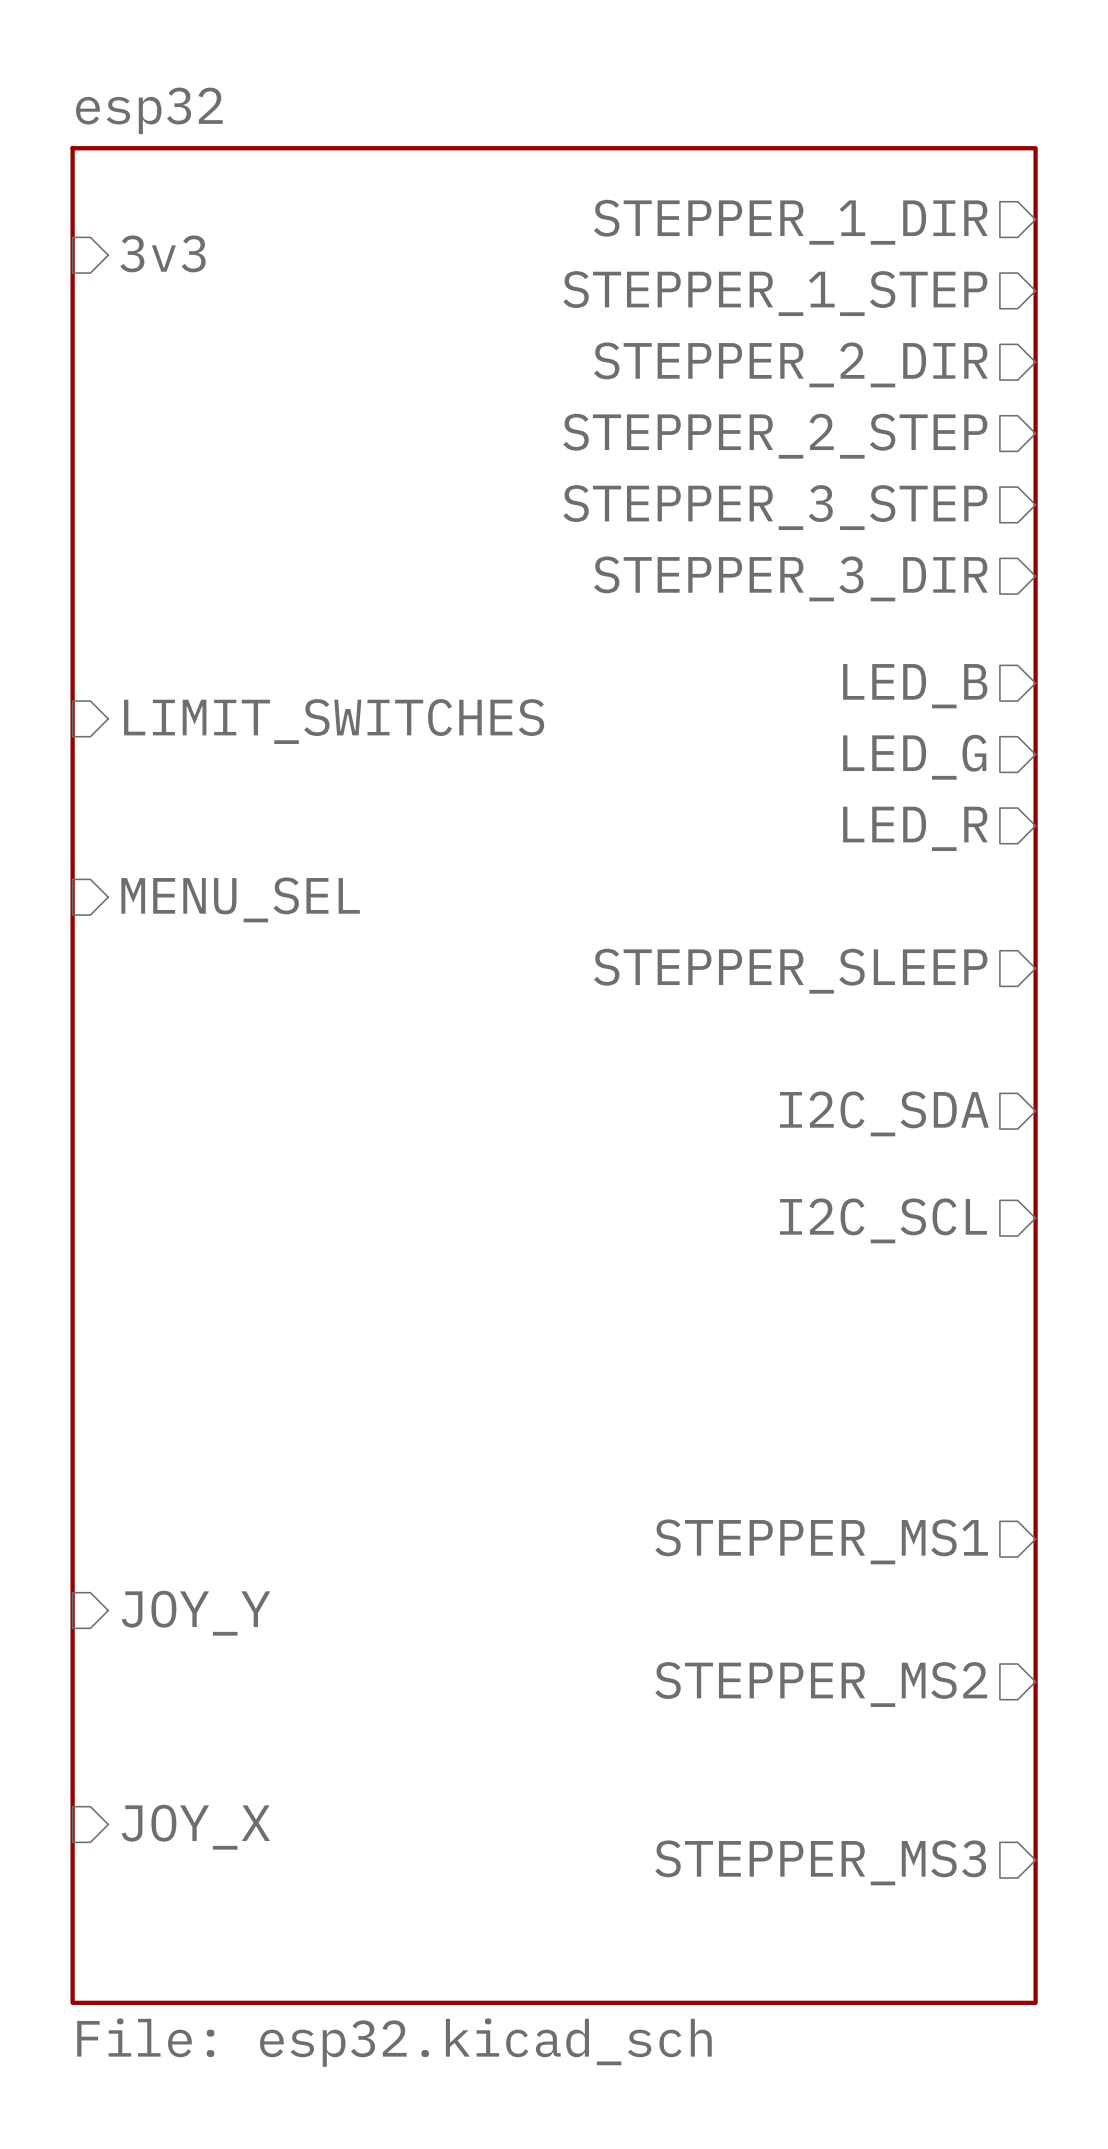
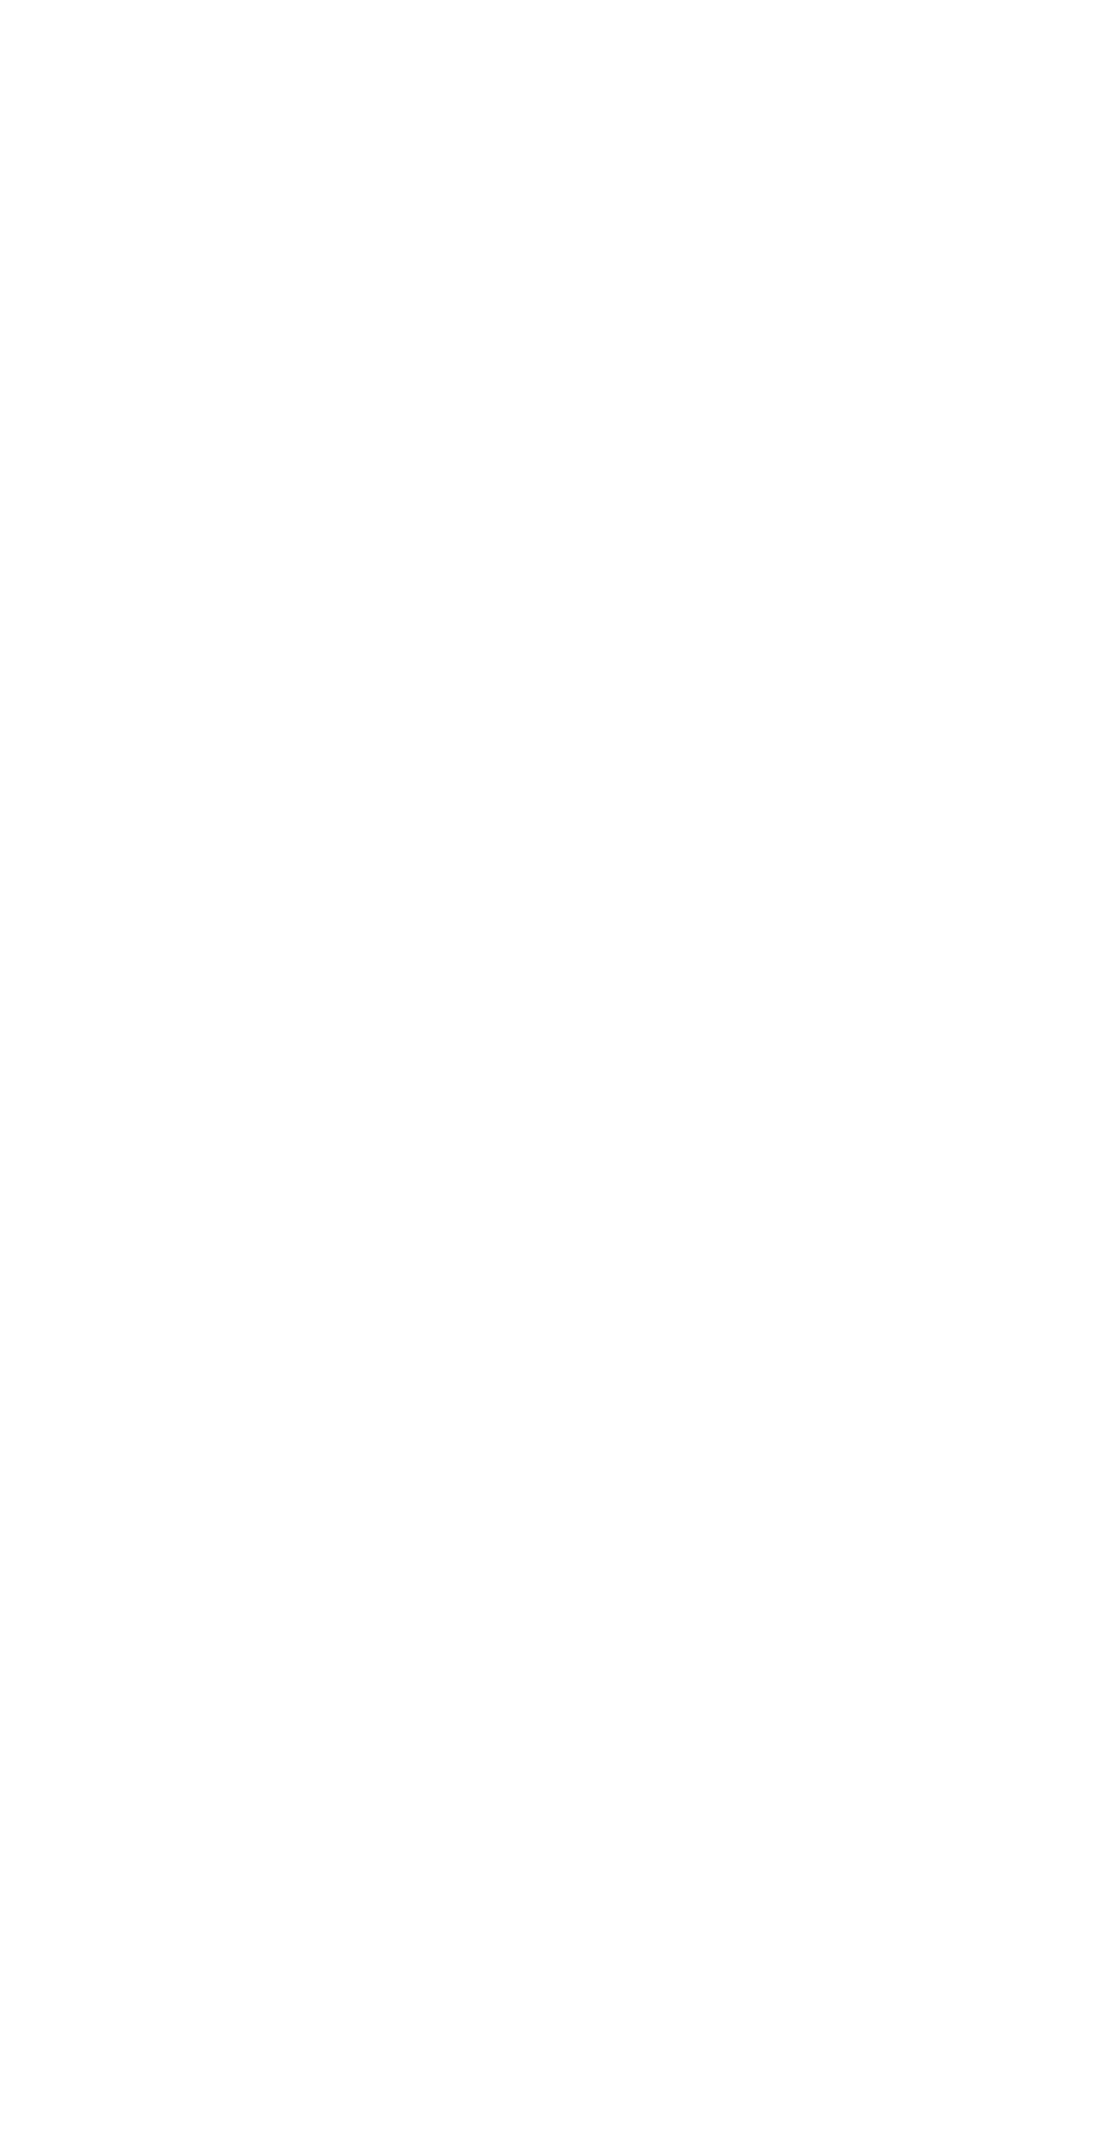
sheet pin: STEPPER_1_DIR (790, 222) -> none
sheet pin: 3v3 (163, 253) -> none
sheet pin: STEPPER_1_STEP (775, 293) -> none
sheet pin: STEPPER_2_DIR (790, 364) -> none
sheet pin: STEPPER_2_STEP (775, 436) -> none
sheet pin: STEPPER_3_STEP (775, 507) -> none
sheet pin: STEPPER_3_DIR (790, 578) -> none
sheet pin: LED_B (915, 686) -> none
sheet pin: LIMIT_SWITCHES (334, 721) -> none
sheet pin: LED_G (914, 757) -> none
sheet pin: LED_R (915, 828) -> none
sheet pin: MENU_SEL (240, 899) -> none
sheet pin: STEPPER_SLEEP (790, 971) -> none
sheet esp32: File: esp32.kicad_sch (554, 1075) -> none
sheet pin: I2C_SDA (884, 1113) -> none
sheet pin: I2C_SCL (883, 1220) -> none
sheet pin: STEPPER_MS1 (821, 1541) -> none
sheet pin: JOY_Y (196, 1613) -> none
sheet pin: STEPPER_MS2 (821, 1684) -> none
sheet pin: JOY_X (195, 1827) -> none
sheet pin: STEPPER_MS3 (820, 1862) -> none

